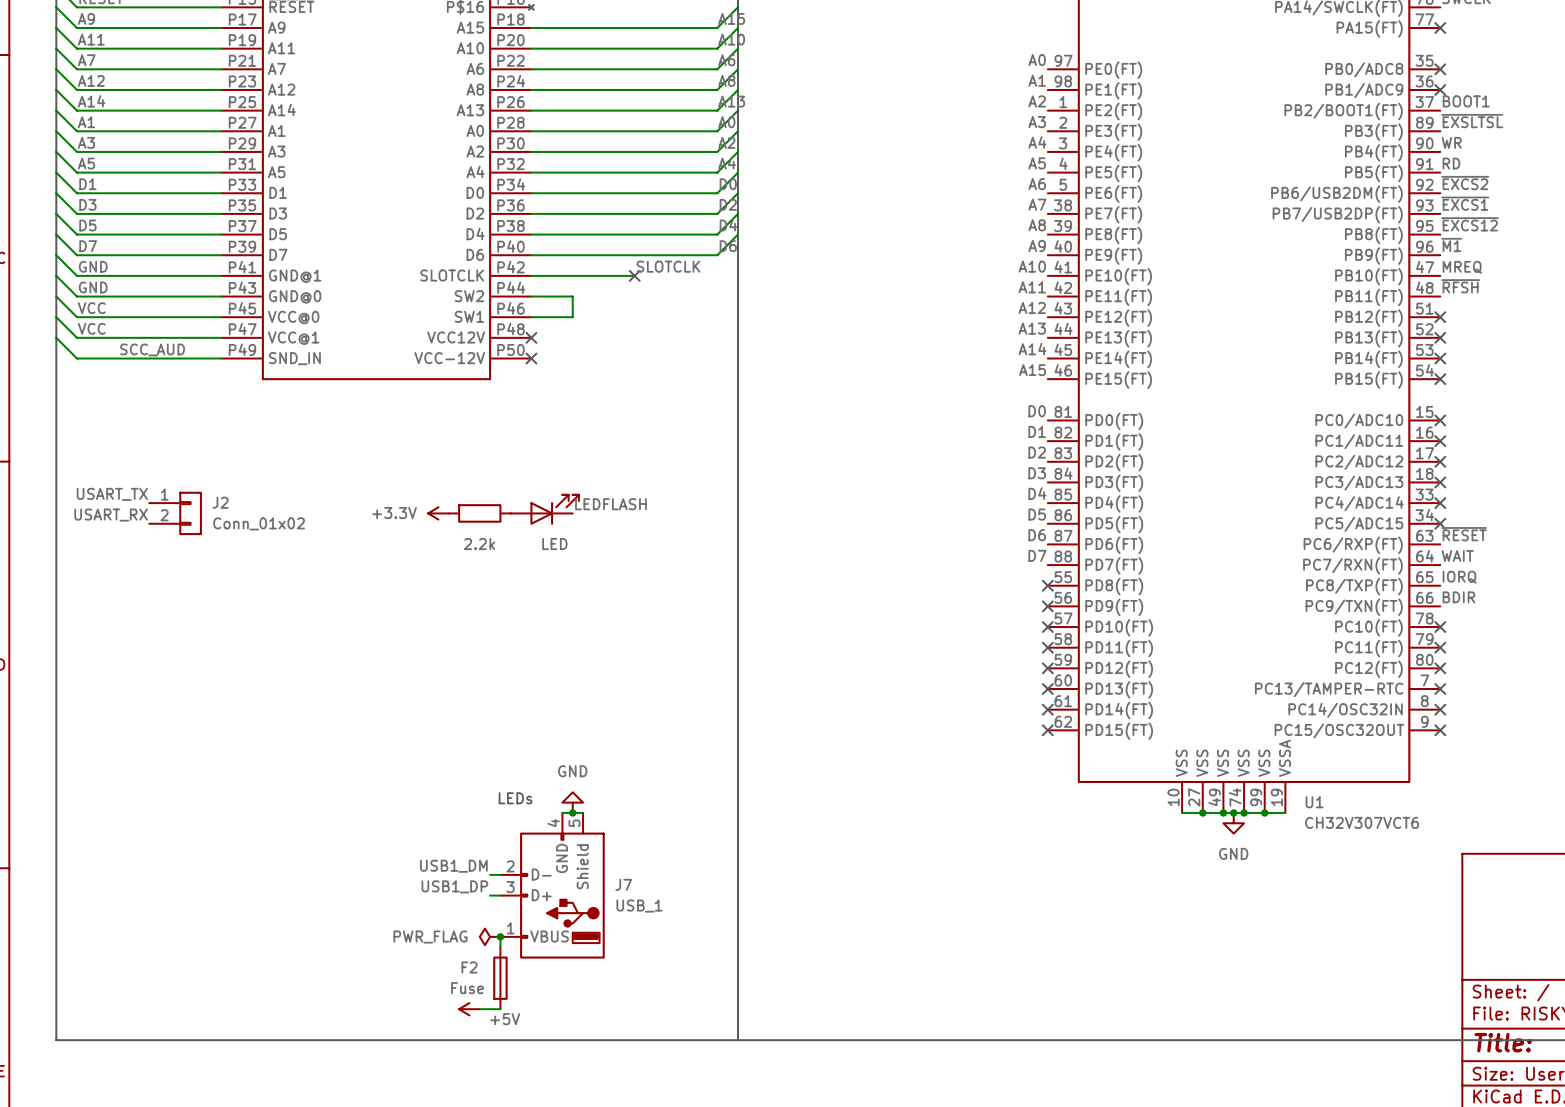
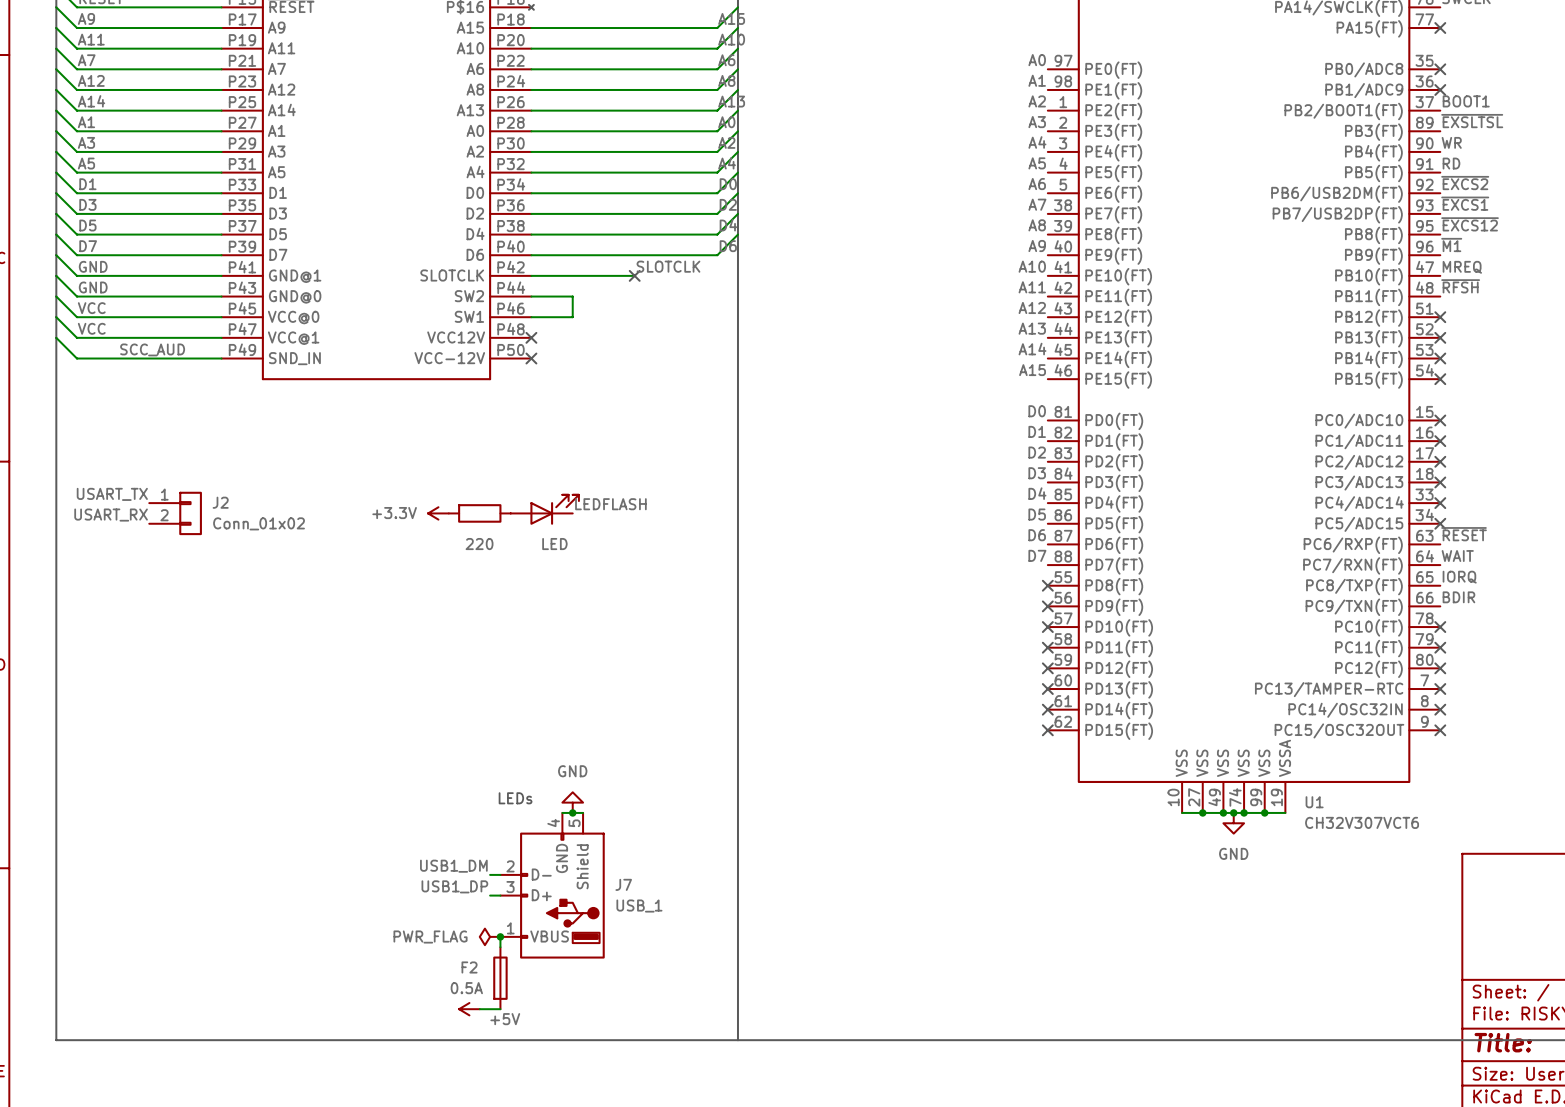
part value: 2.2k (479, 544) -> 220 (479, 544)
F2 value: Fuse (467, 988) -> 0.5A (466, 988)

